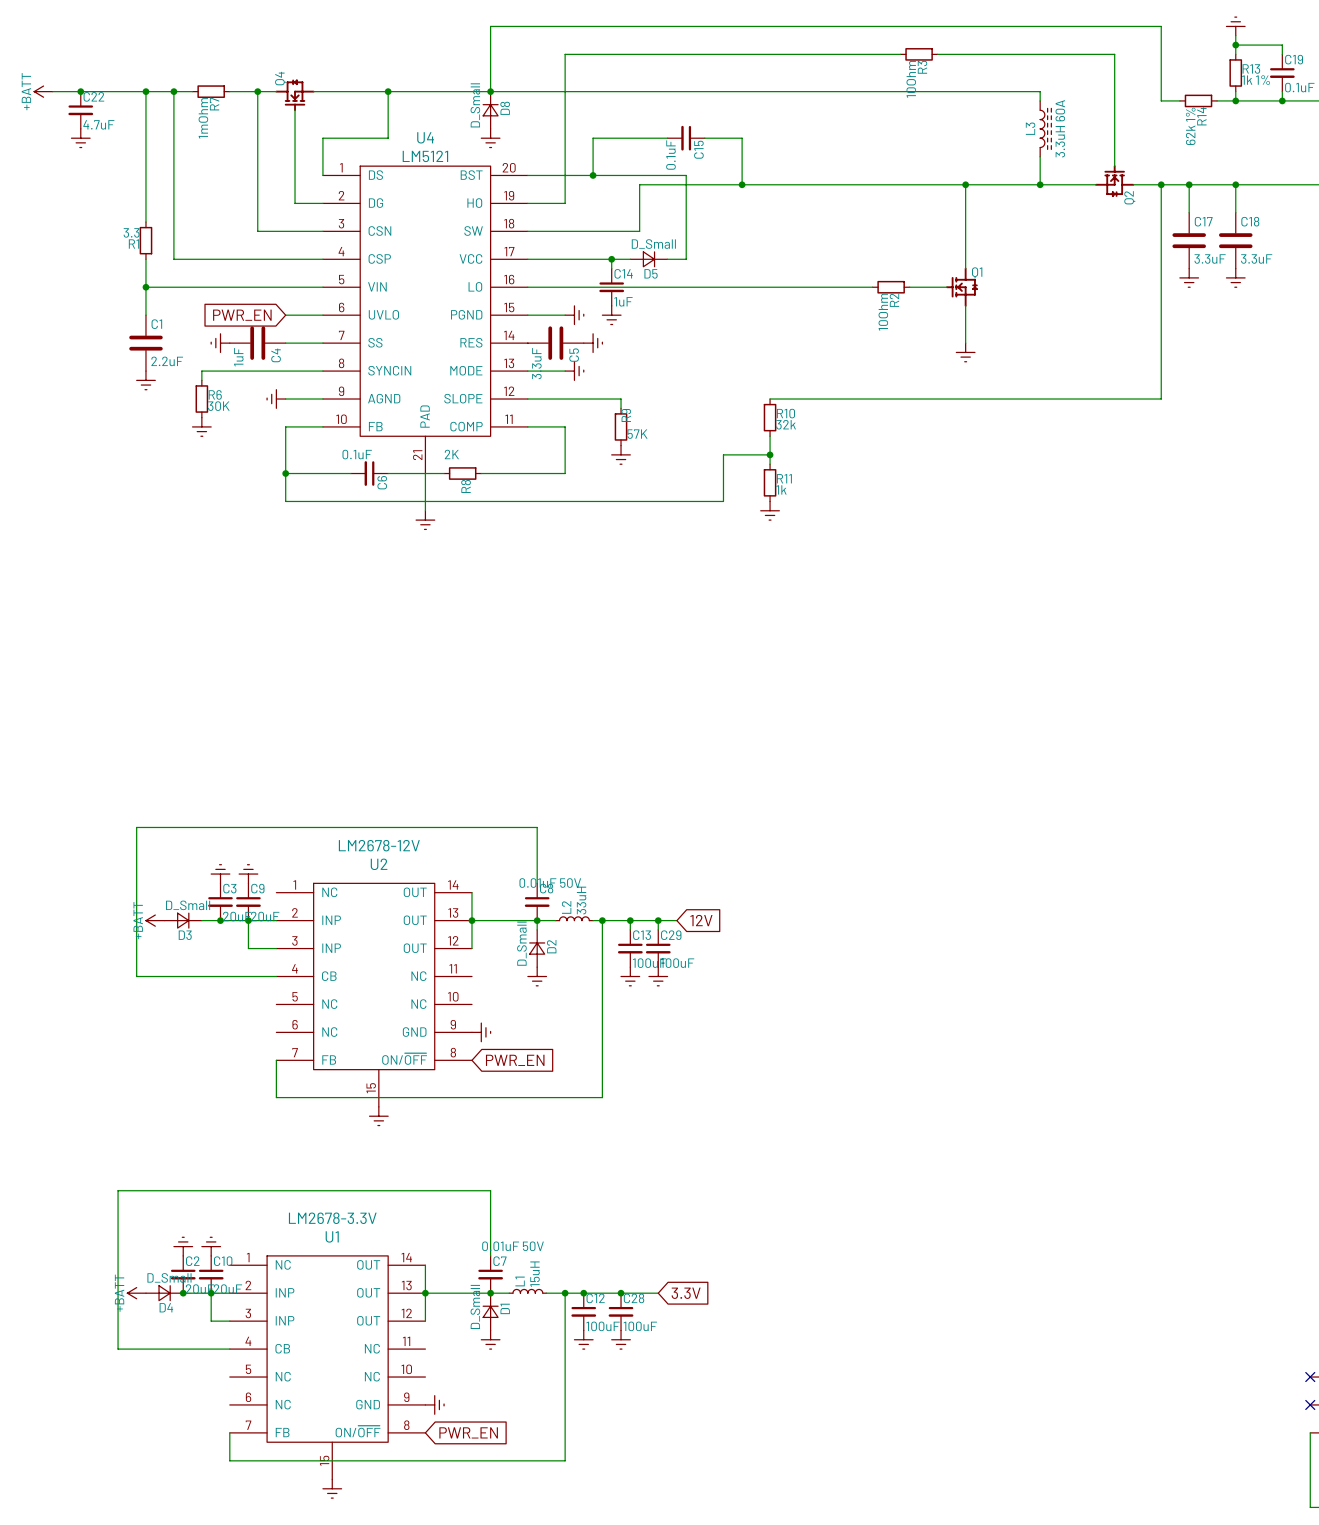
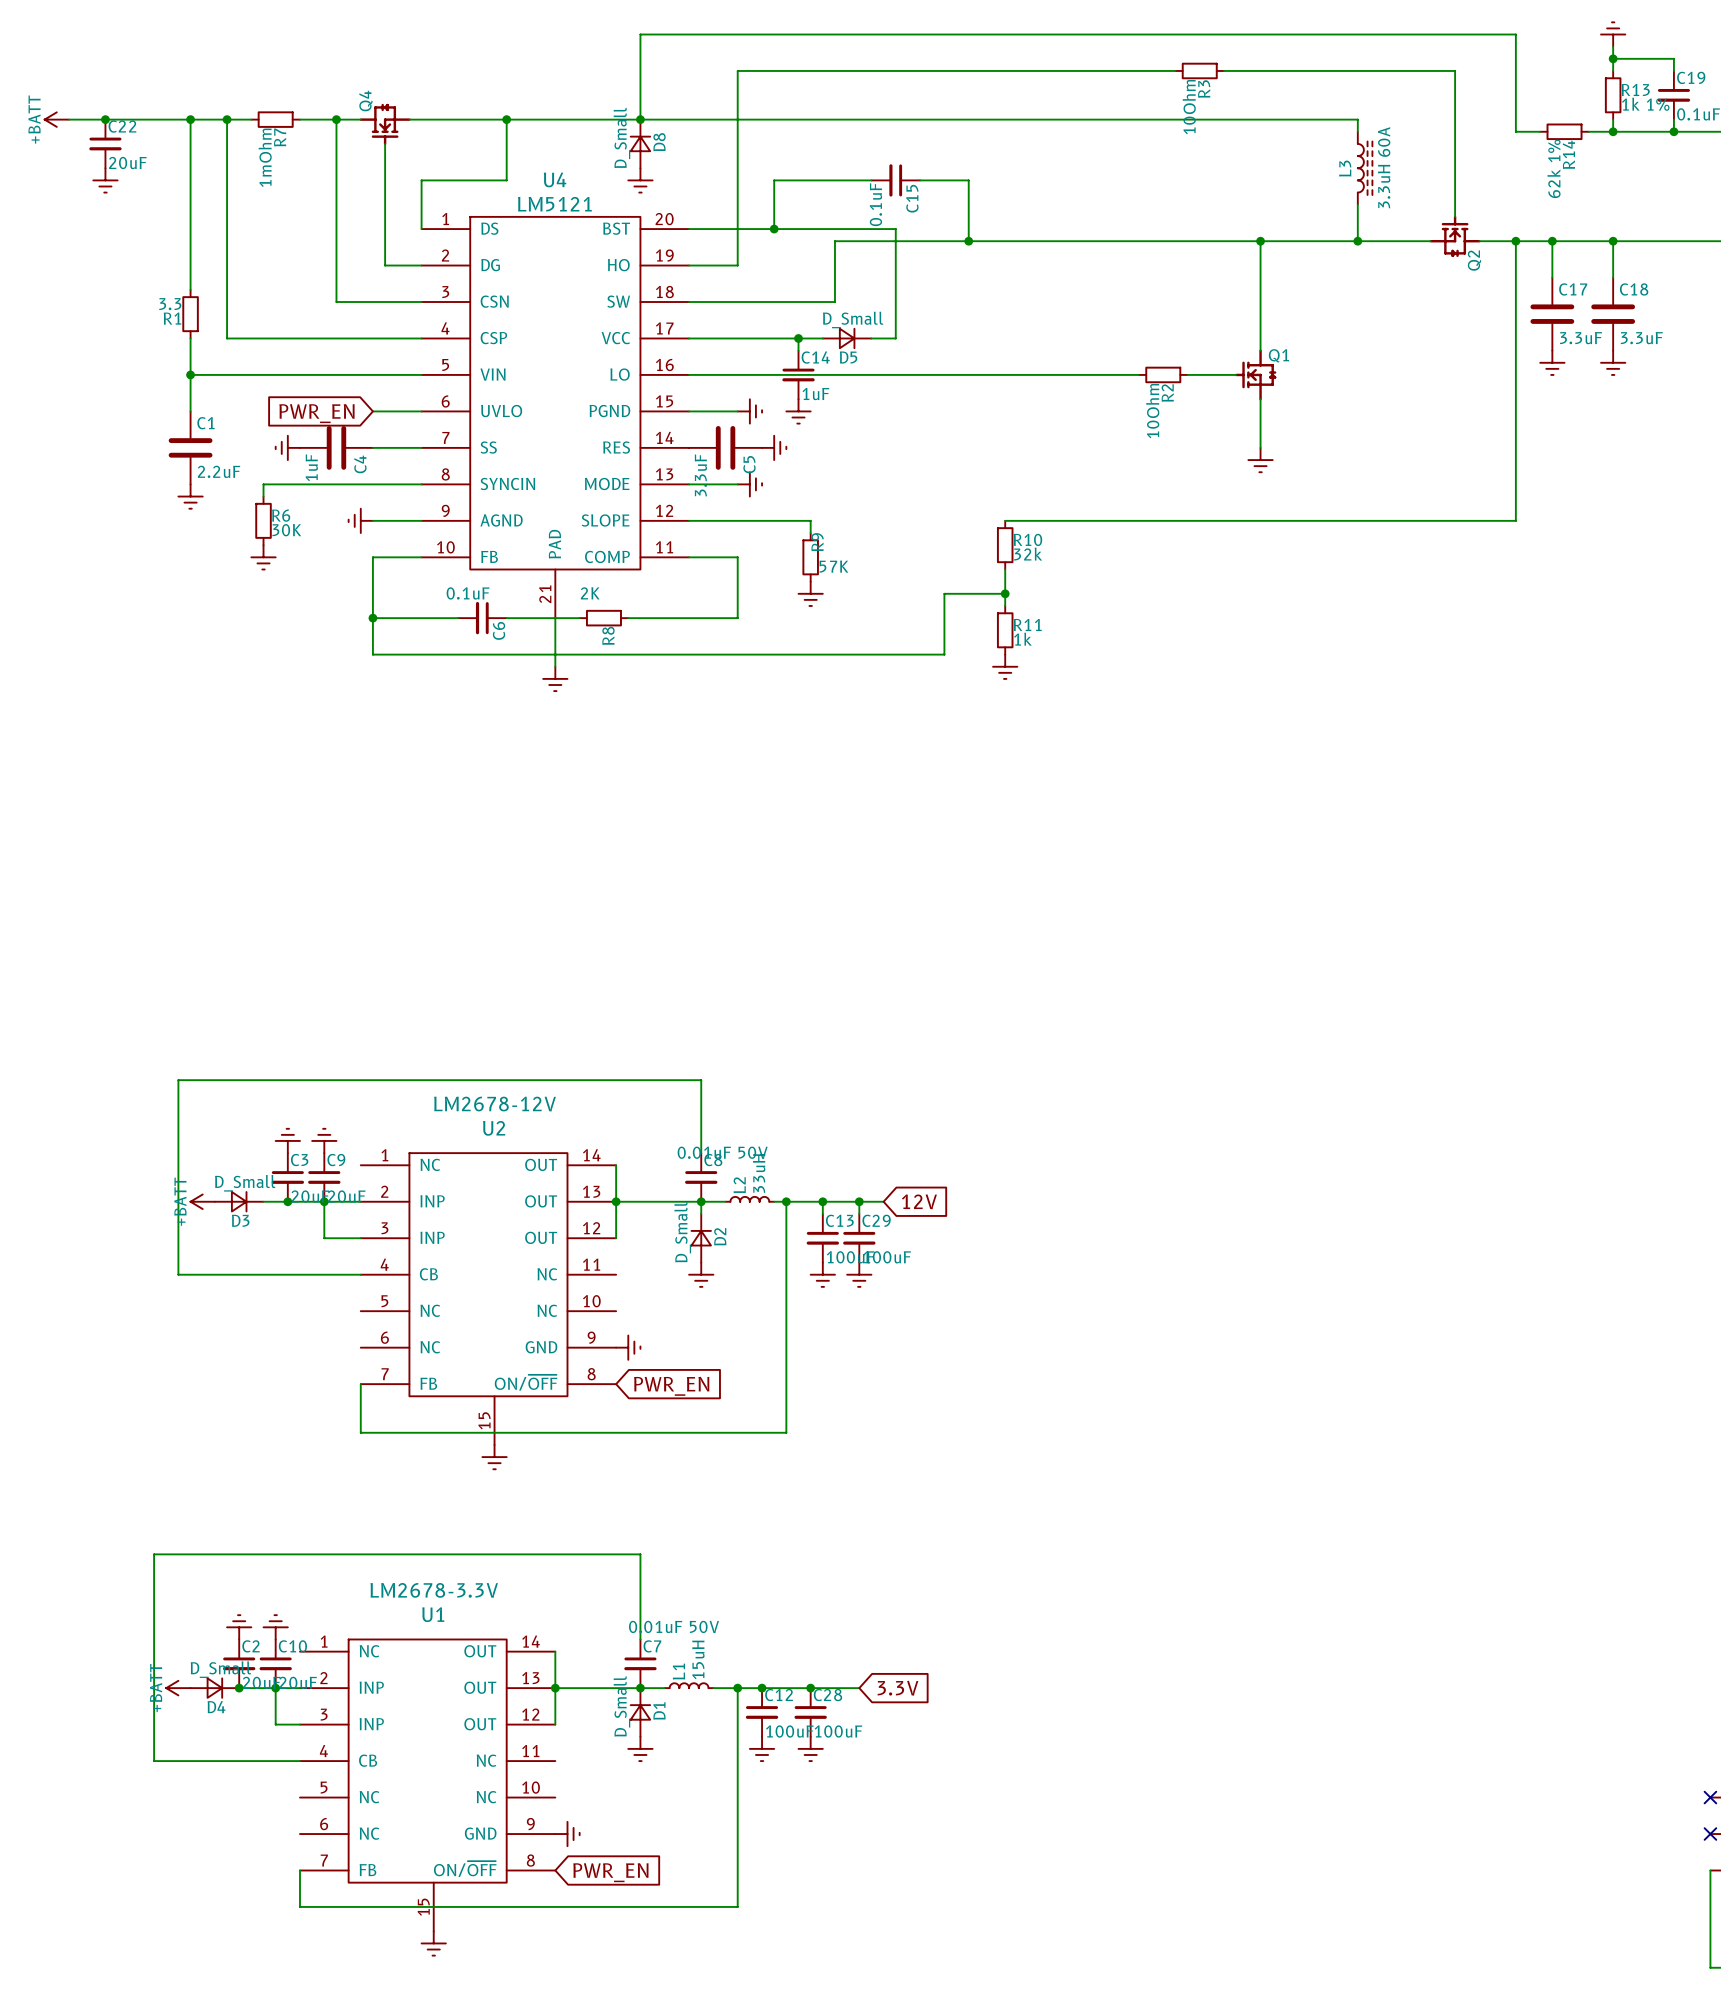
C22 value: 4.7uF (98, 124) -> 20uF (127, 163)

